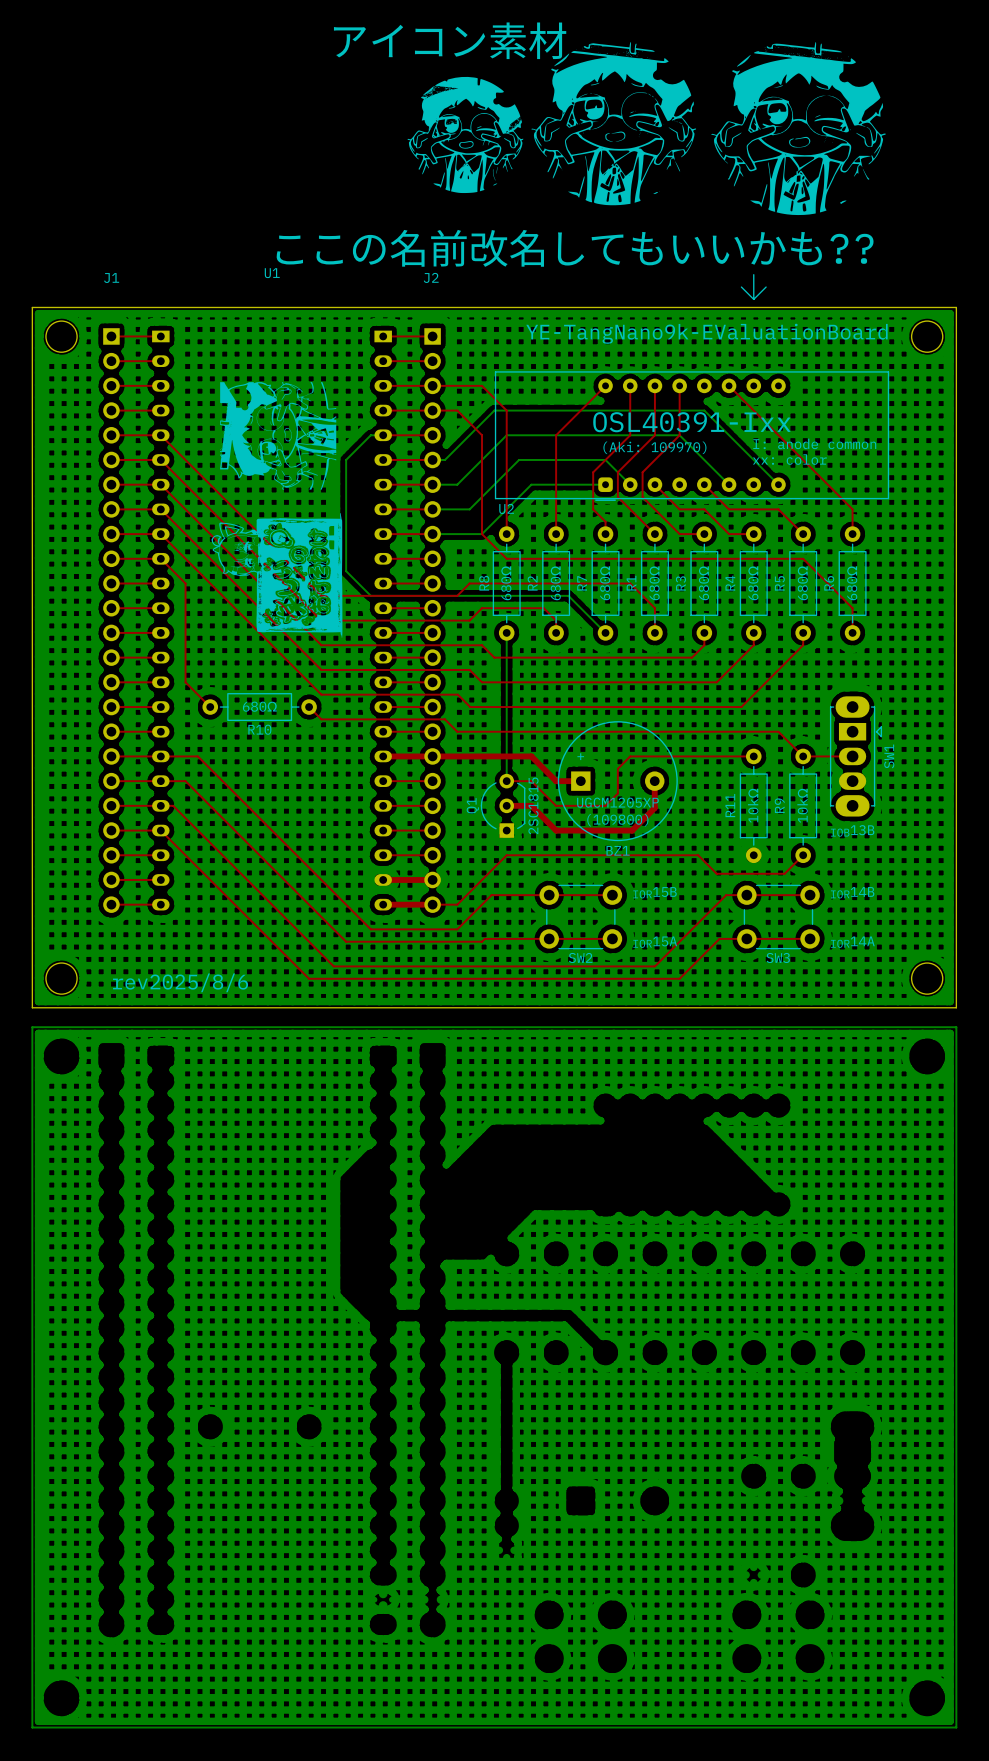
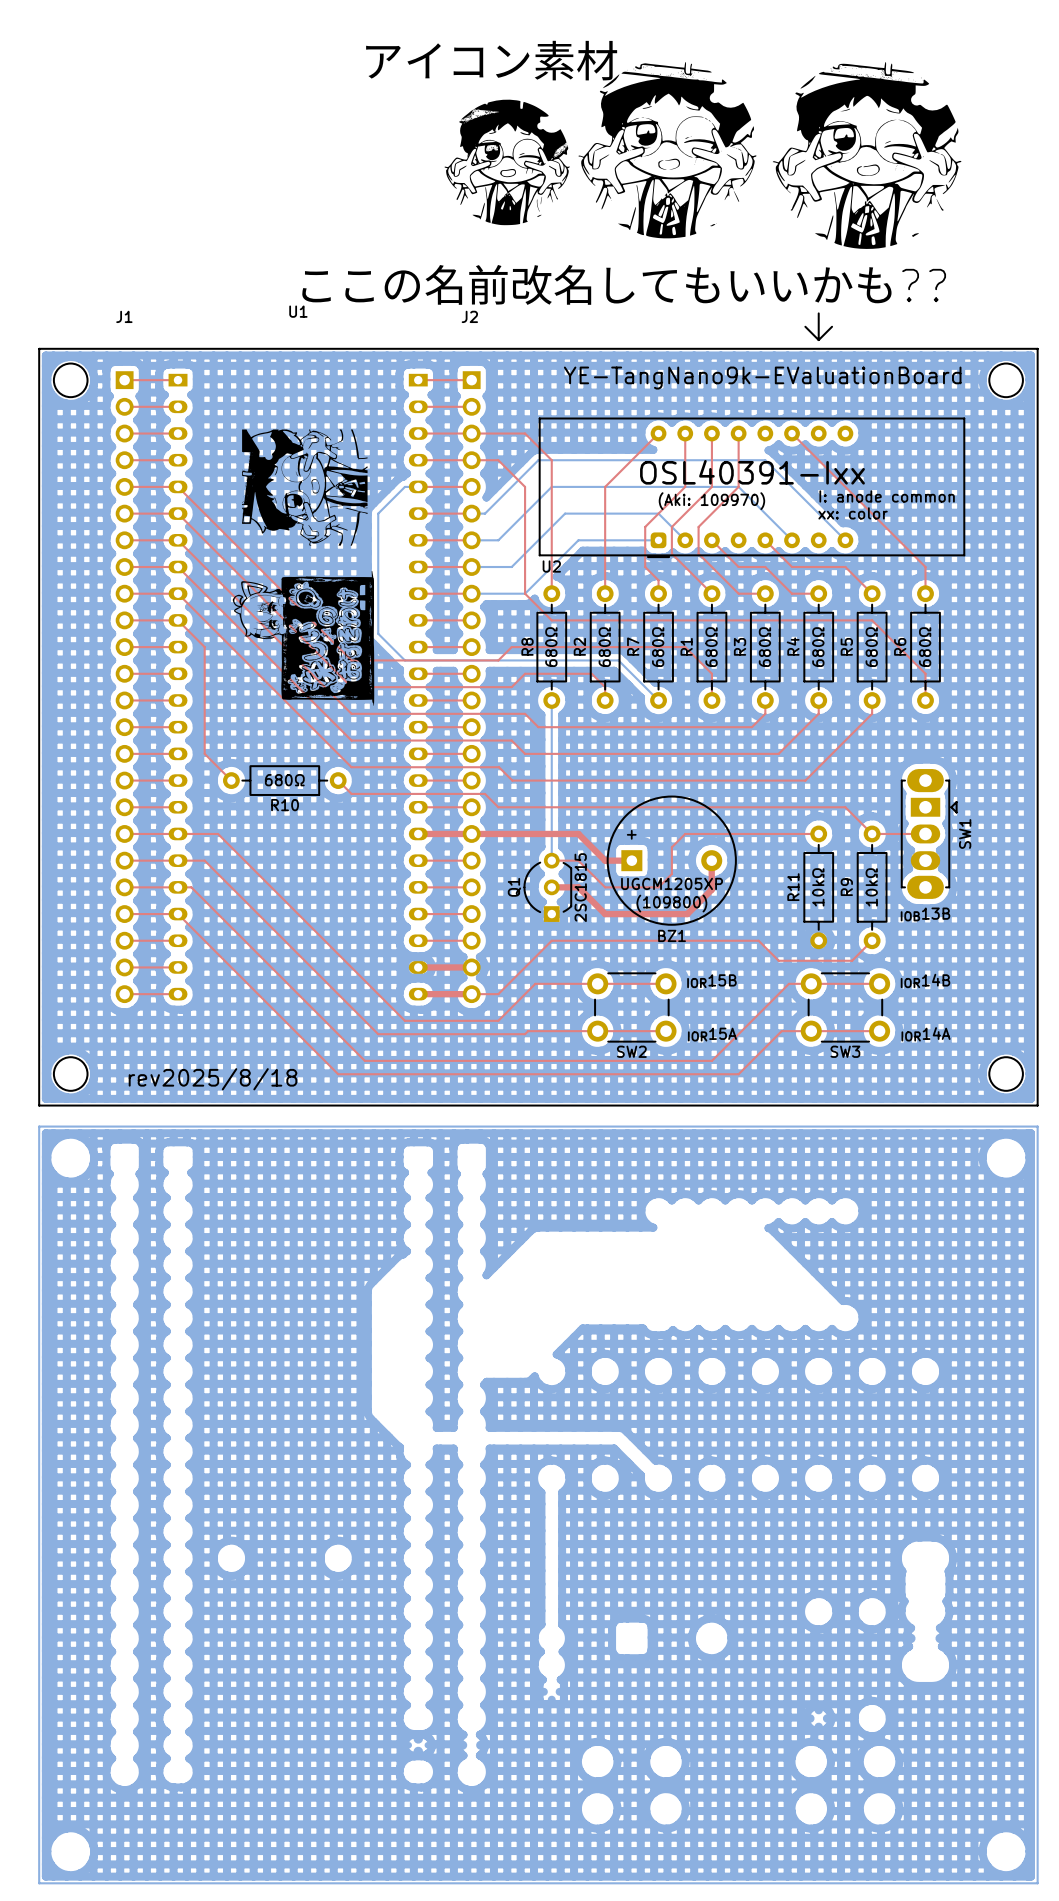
text: rev2025/8/6 (180, 982) -> rev2025/8/18 (213, 1079)

